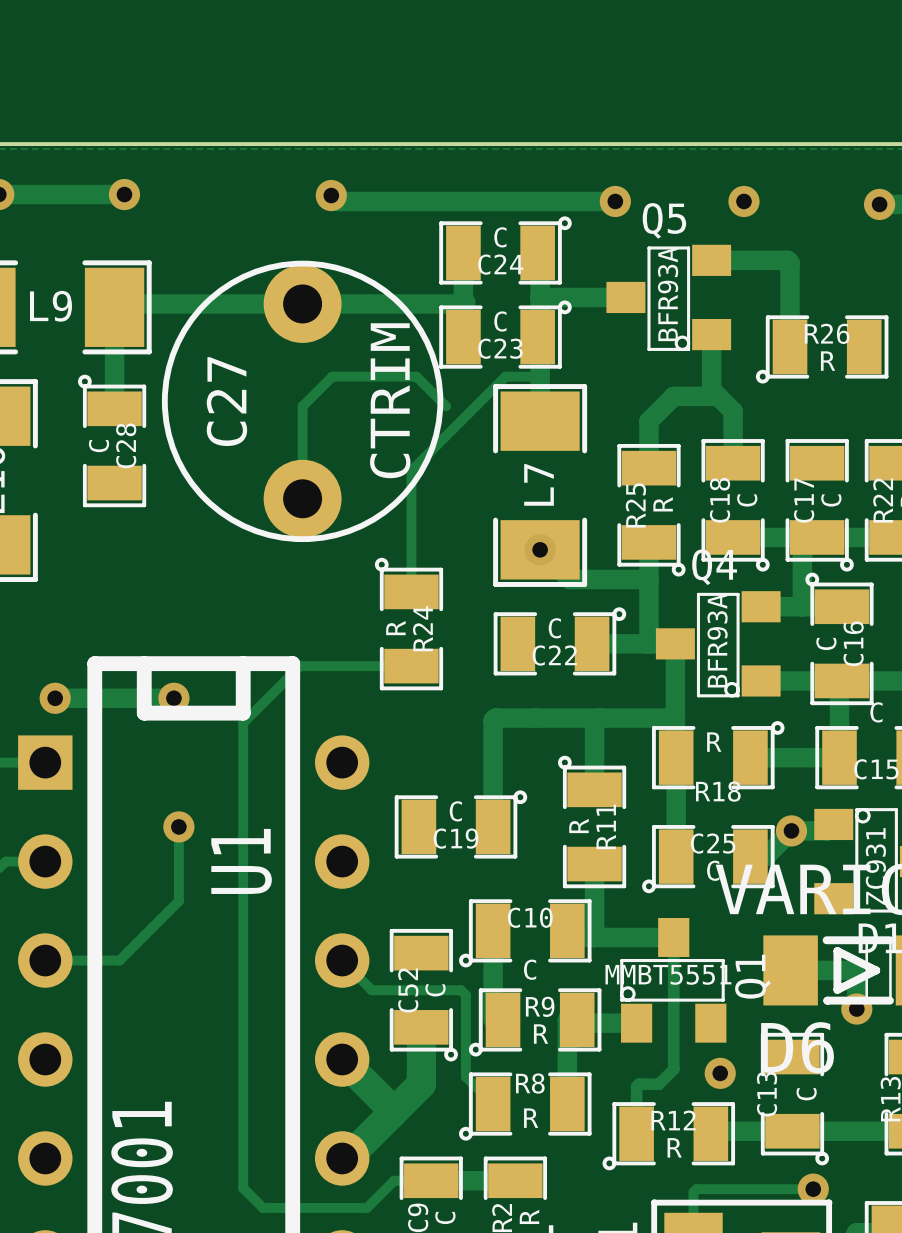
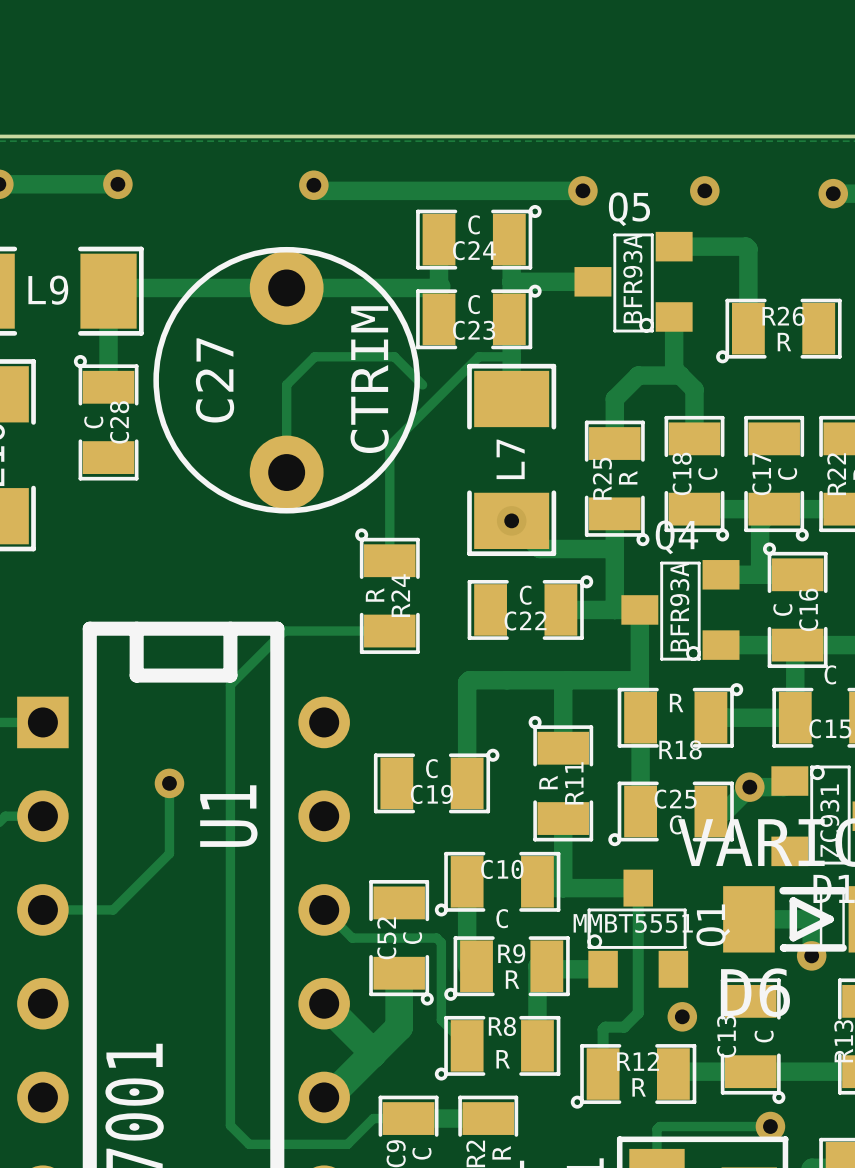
track: (55, 698) (173, 698) -> none
via: (55, 698) -> none
via: (173, 698) -> none

